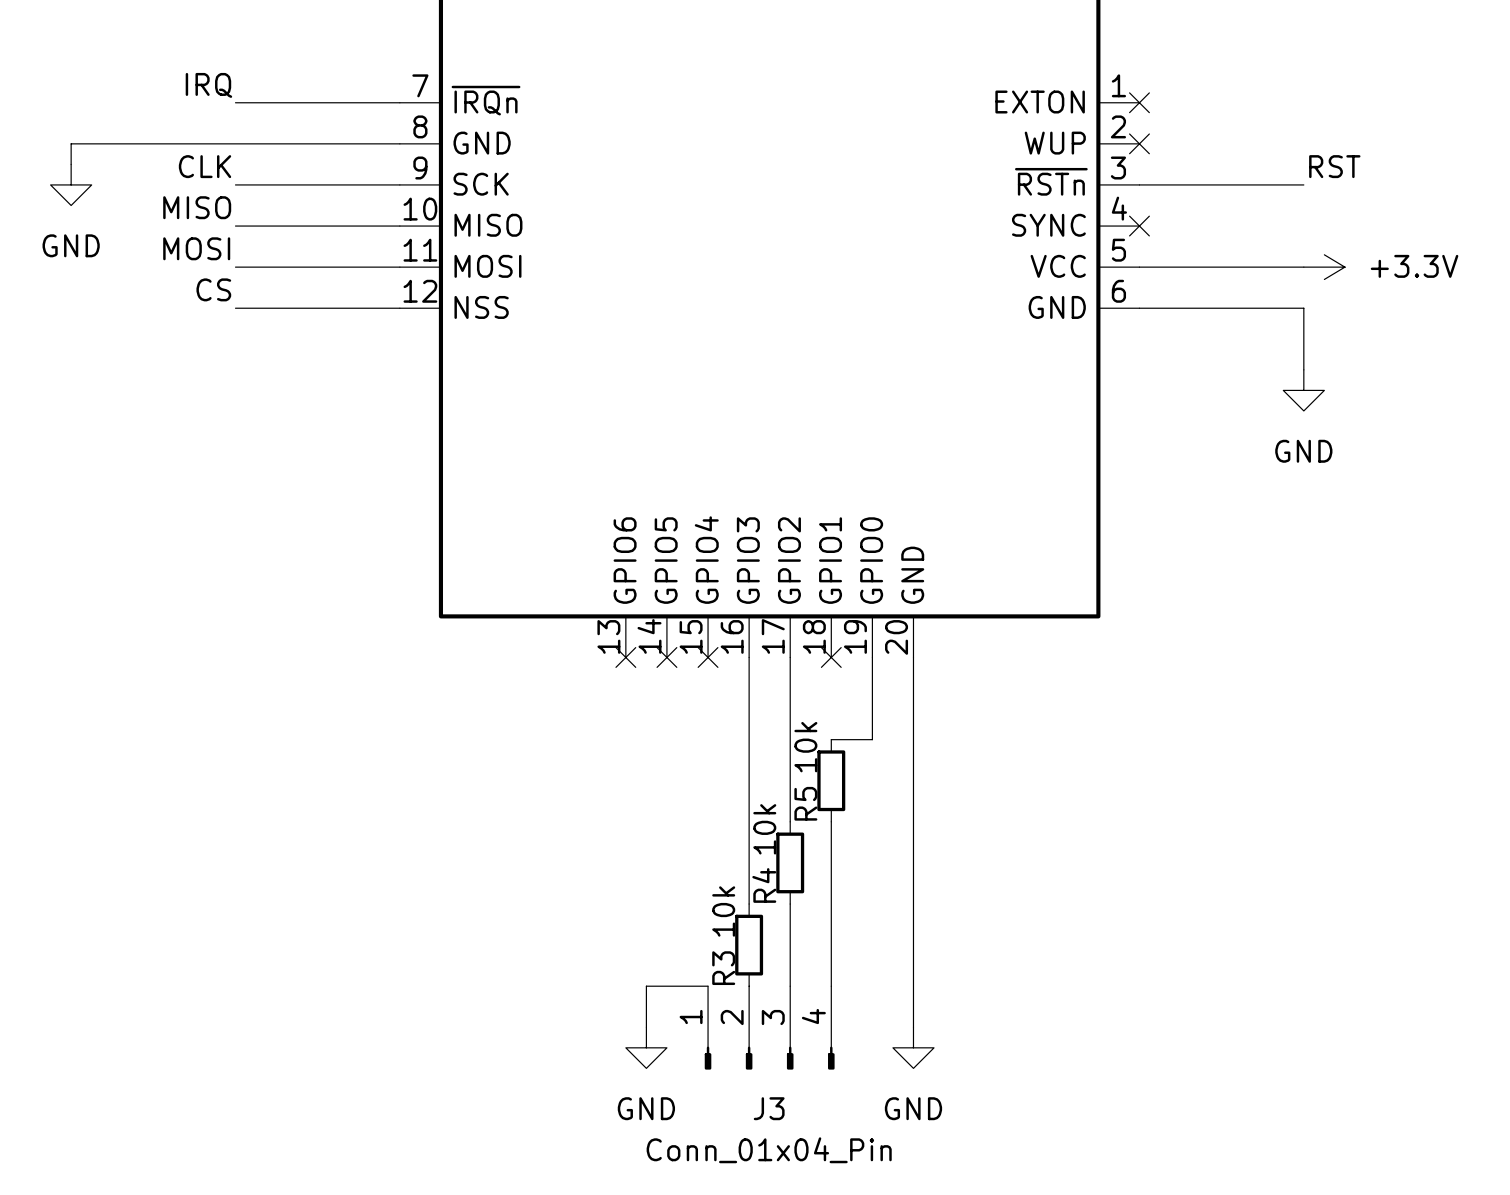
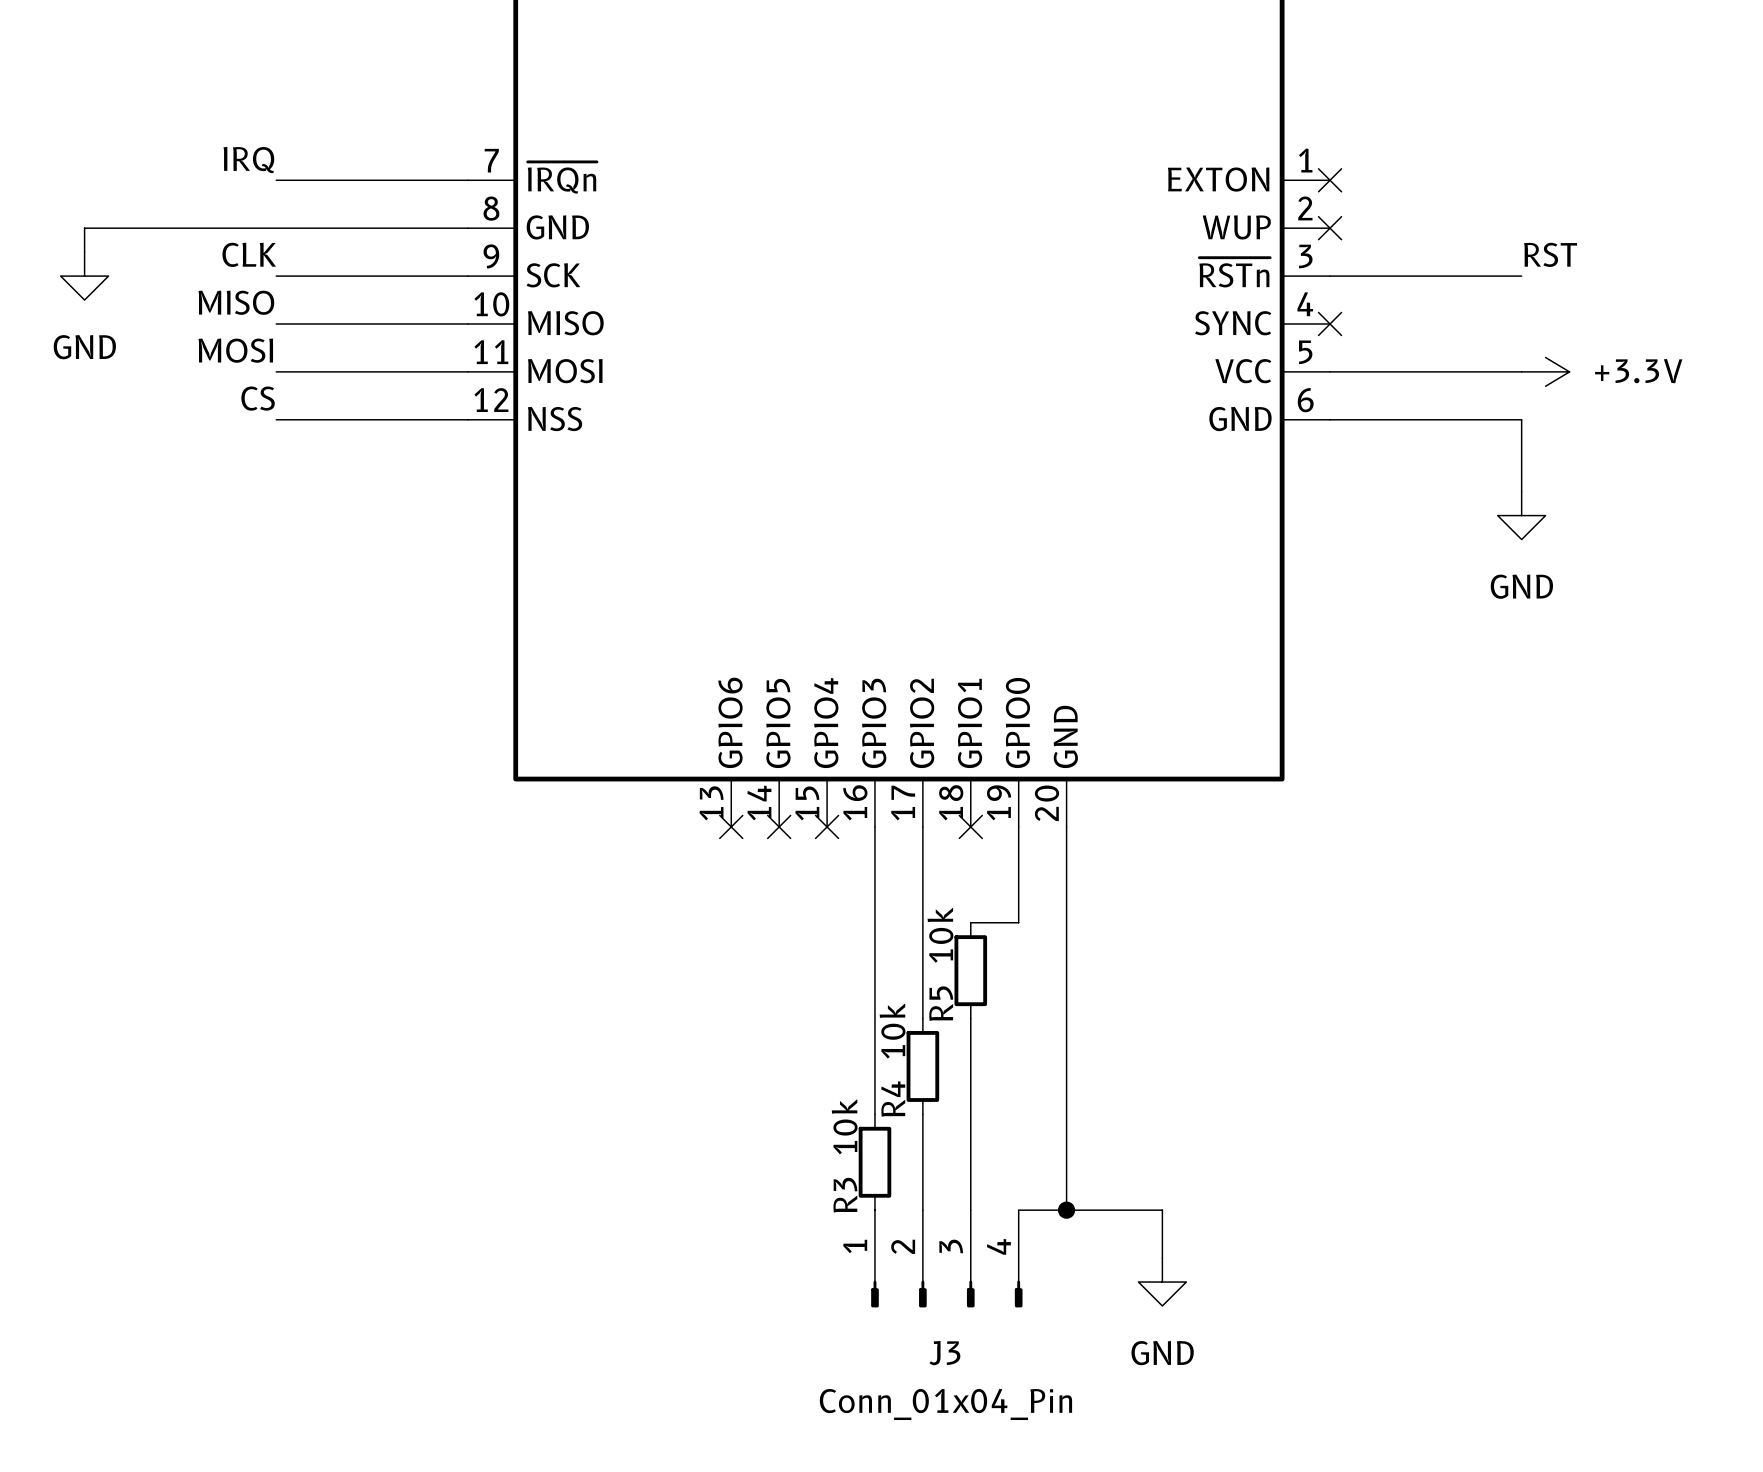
wire: (708, 986) (646, 986) (646, 1027) -> none
wire: none -> (1018, 1210) (1162, 1210) (1162, 1258)
wire: (913, 986) (913, 1027) -> none
junction: none -> (1066, 1210)
J3 position: (769, 1027) -> (946, 1258)
power symbol: GND (646, 1047) -> none
power symbol position: GND (913, 1047) -> GND (1162, 1282)

